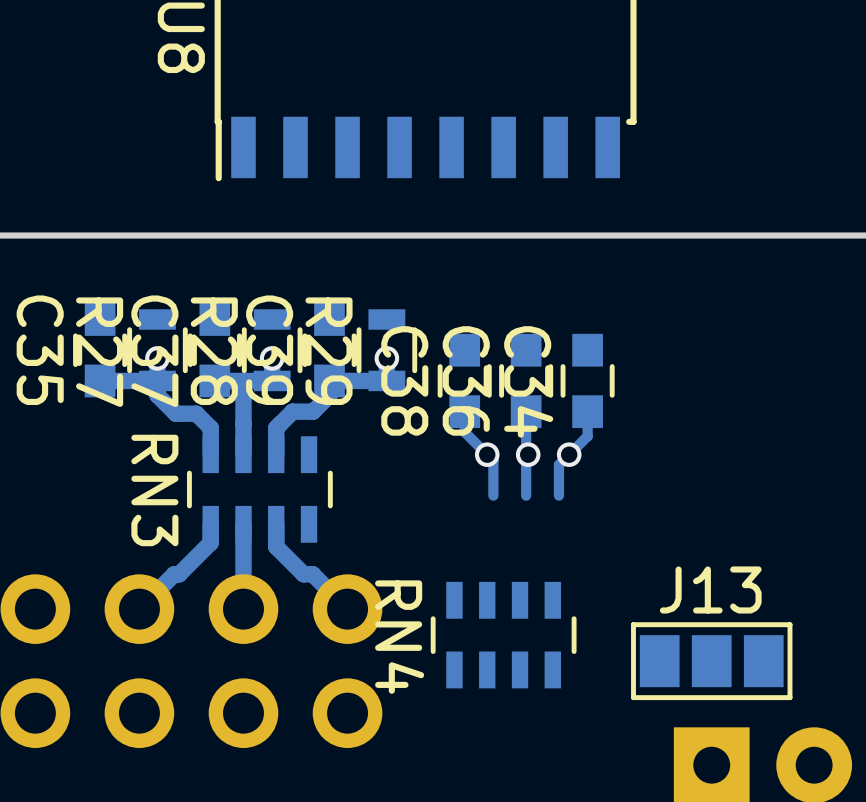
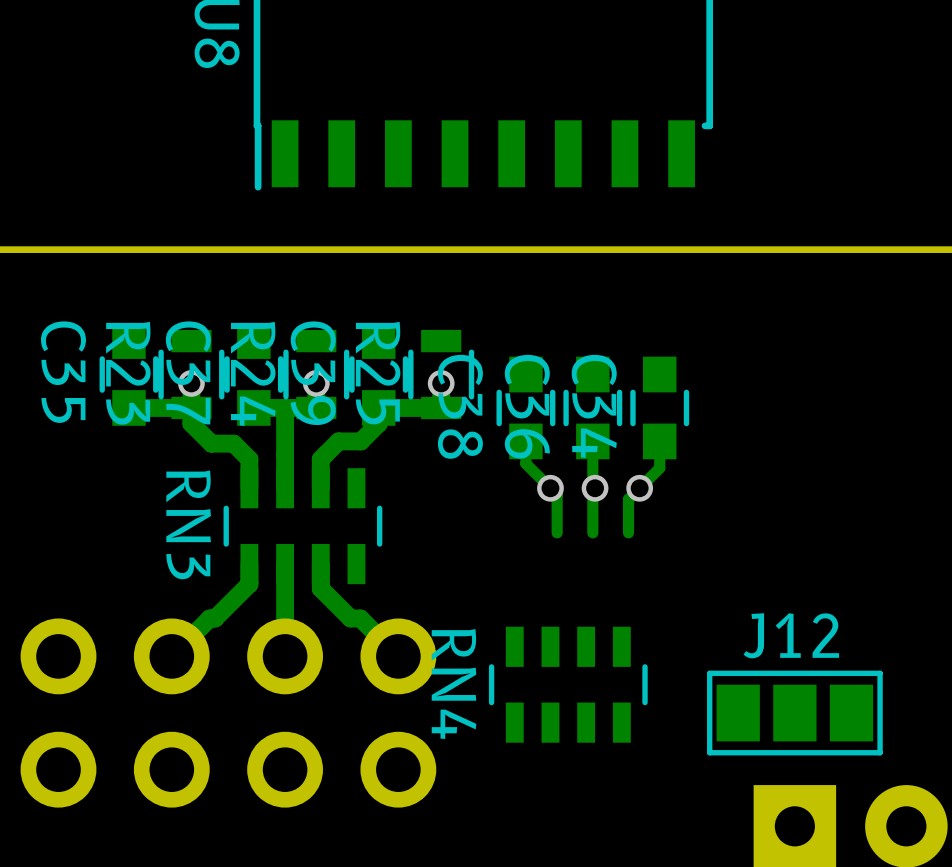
R28 name: R28 (214, 351) -> R24 (253, 373)
R29 name: R29 (329, 351) -> R25 (378, 373)
R27 name: R27 (99, 352) -> R23 (128, 373)
J13 name: J13 (710, 589) -> J12 (791, 635)

